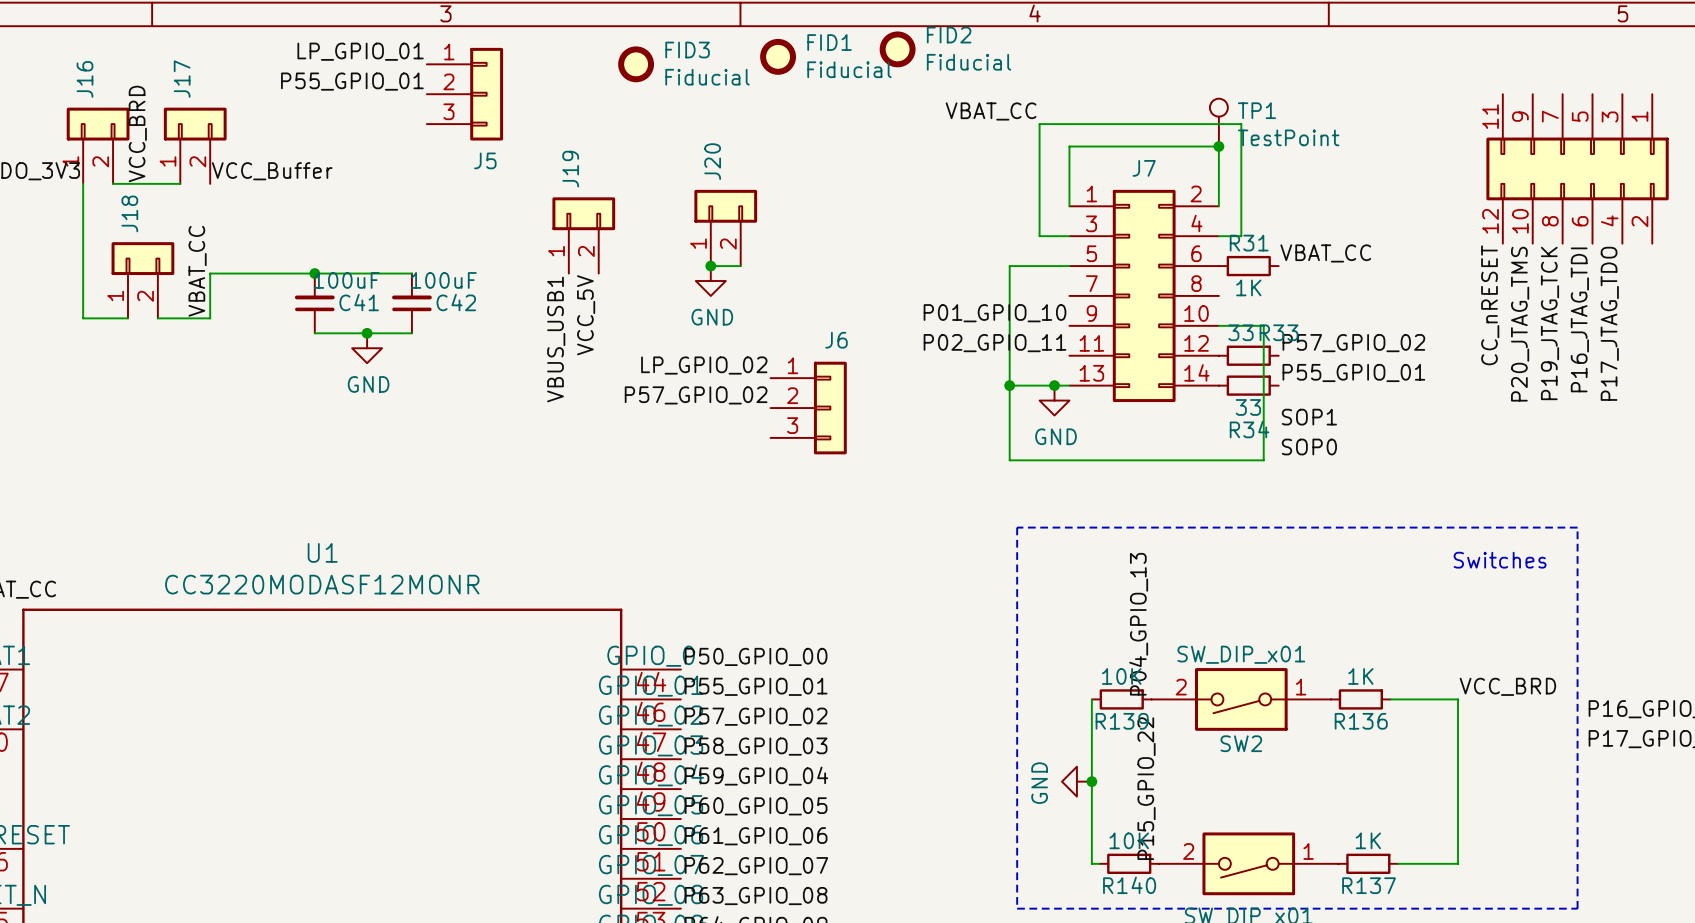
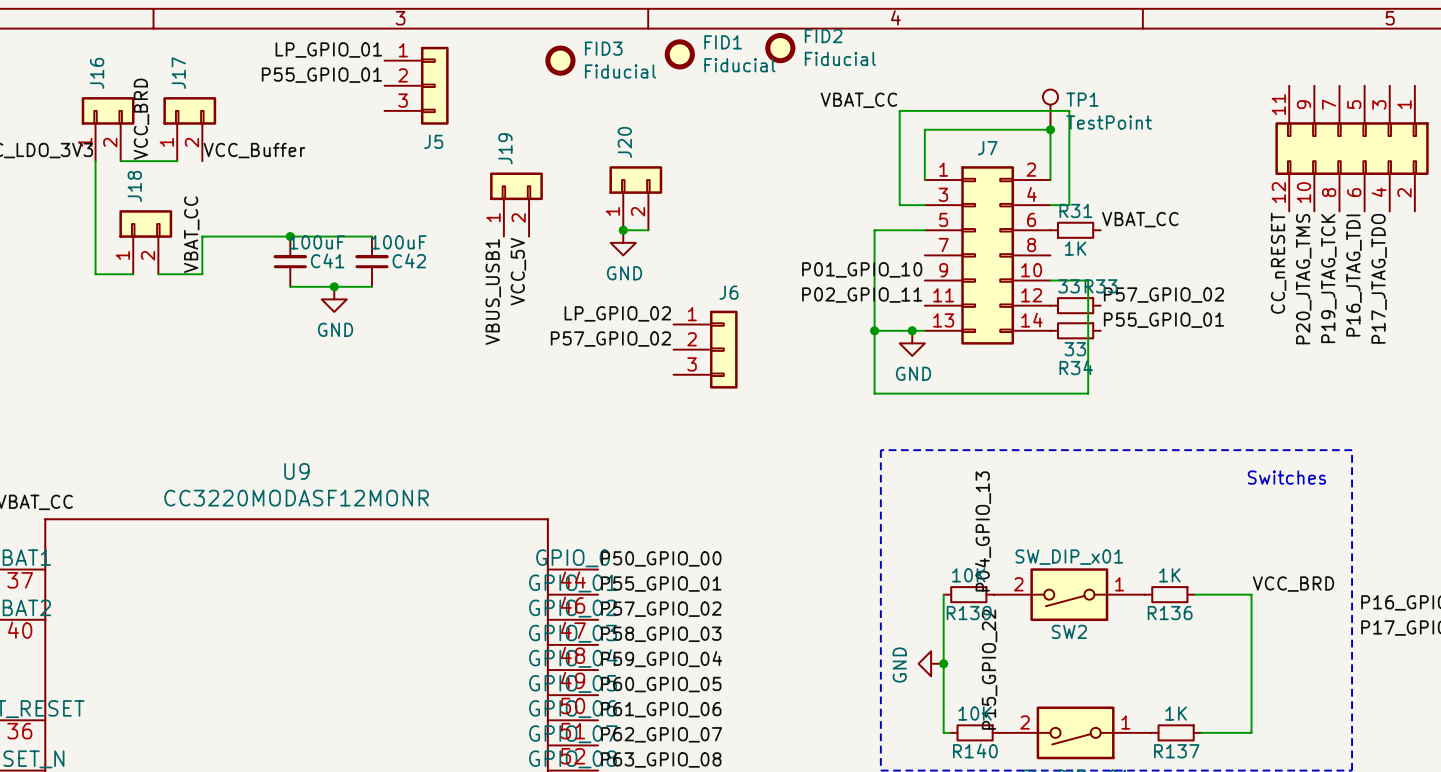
label: SOP1 (1309, 417) -> none
label: SOP0 (1309, 447) -> none
U1 name: U1 (322, 552) -> U9 (296, 471)

